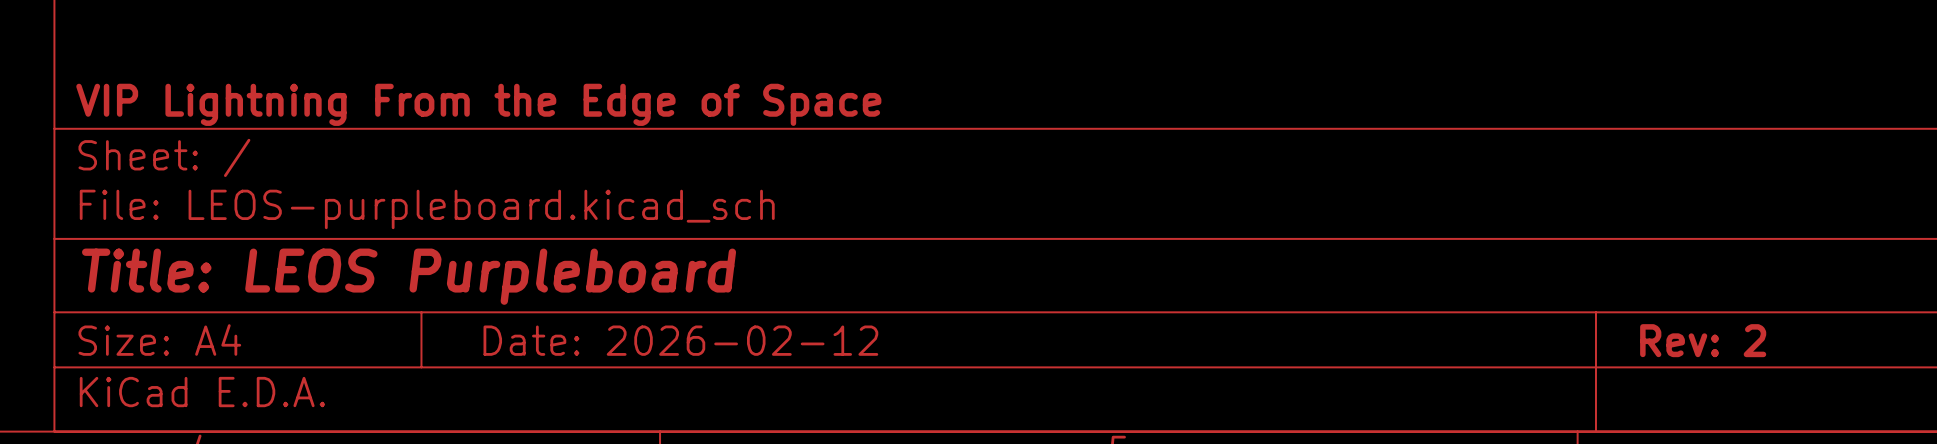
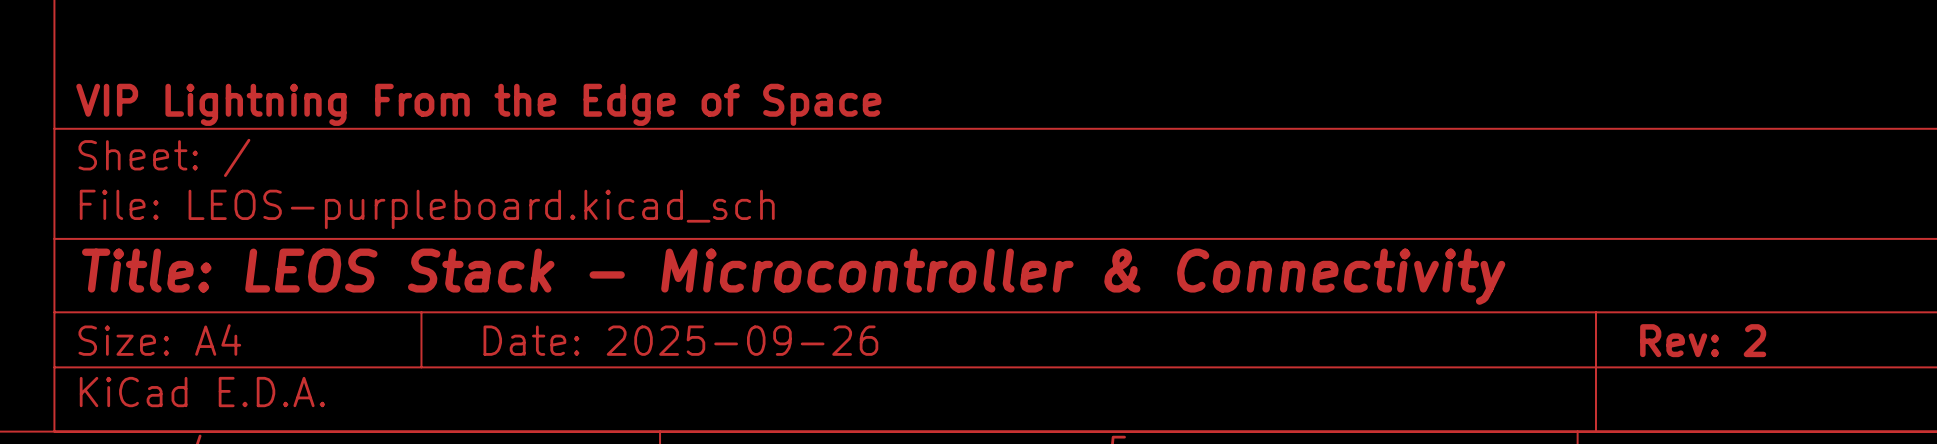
title block: Title: LEOS Purpleboard (409, 276) -> Title: LEOS Stack - Microcontroller & Connectivity (793, 276)
title block: Date: 2026-02-12 (680, 340) -> Date: 2025-09-26 (680, 340)

